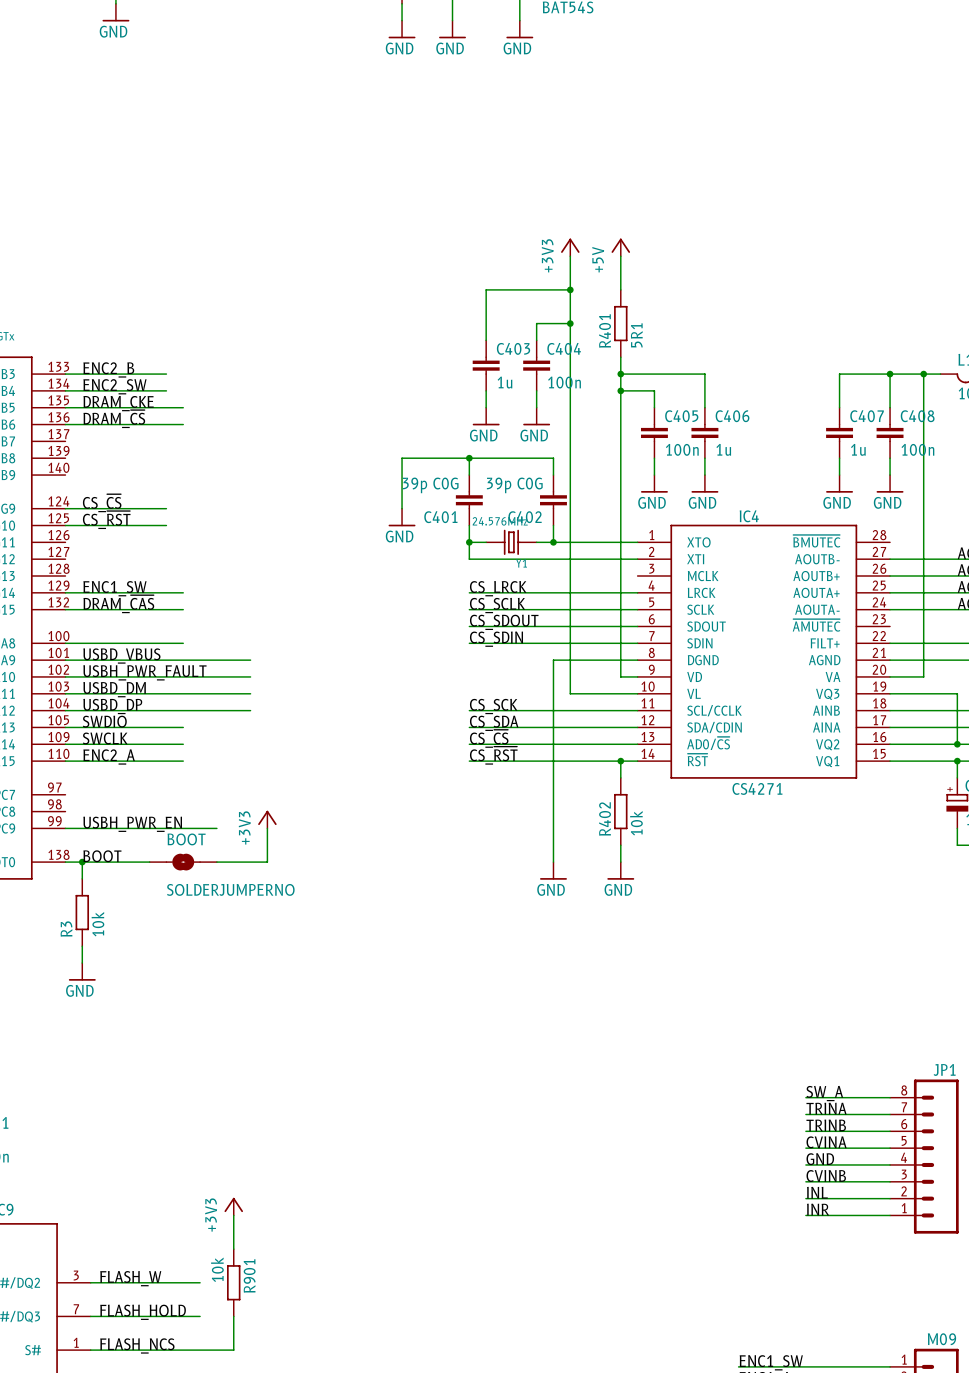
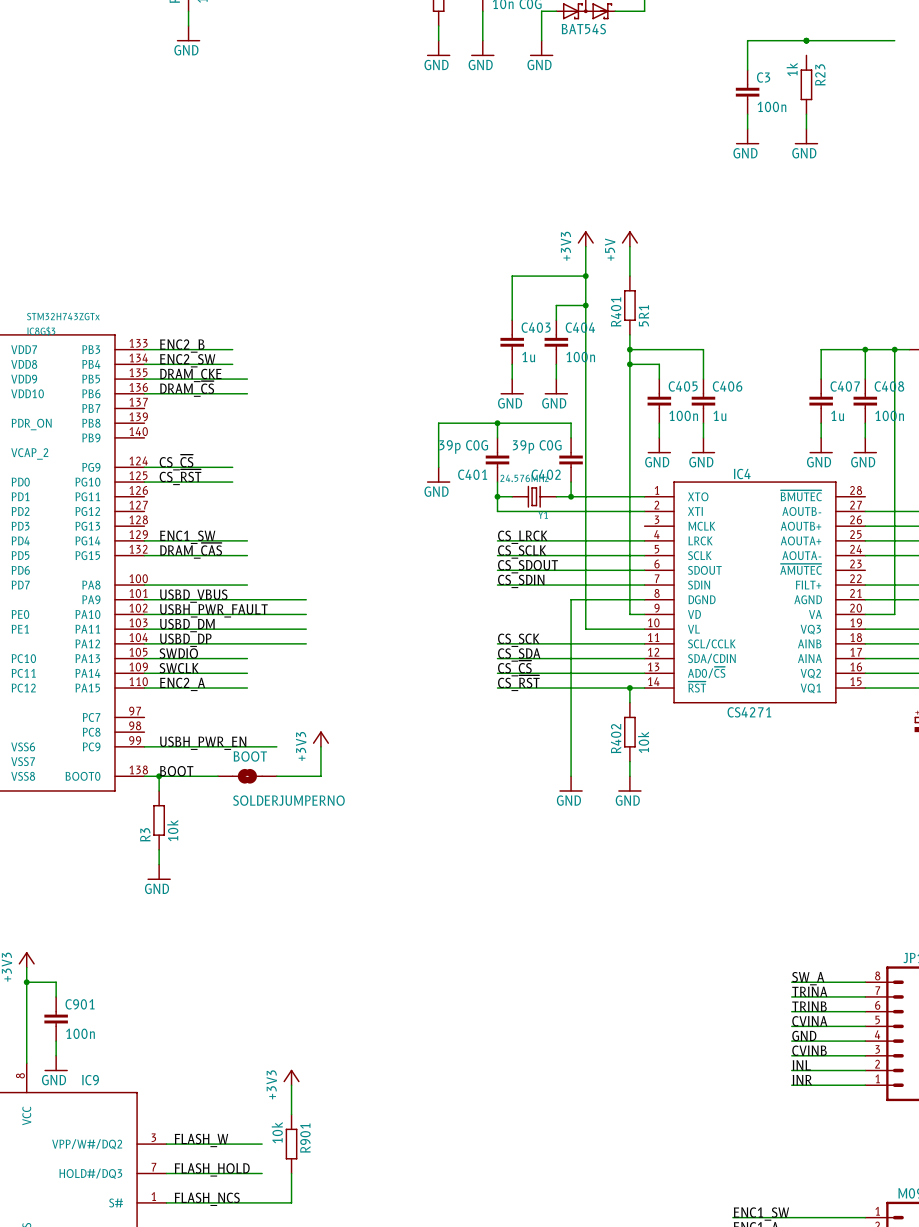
junction: none -> (806, 40)
wire: none -> (894, 40) (747, 40) (747, 70)
R23: none -> 1k (806, 84)
C3: none -> 100n (747, 92)
wire: none -> (747, 114) (747, 128)
wire: none -> (806, 114) (806, 128)
power symbol: none -> GND (747, 136)
power symbol: none -> GND (806, 136)

